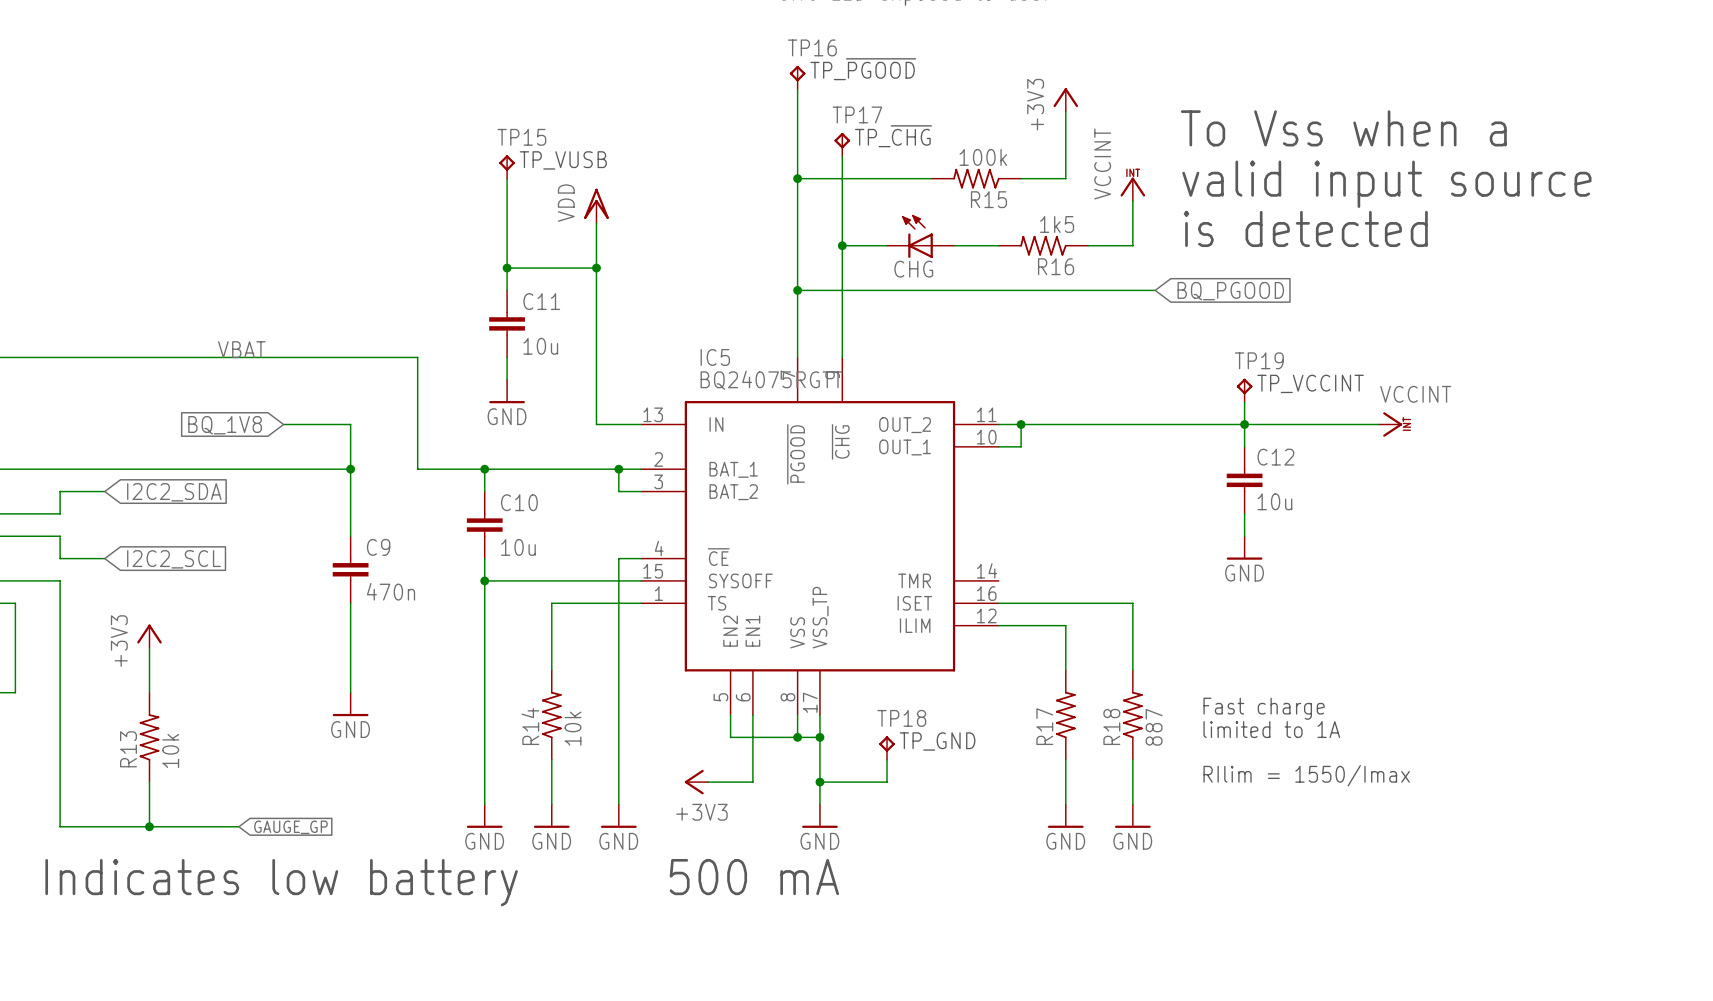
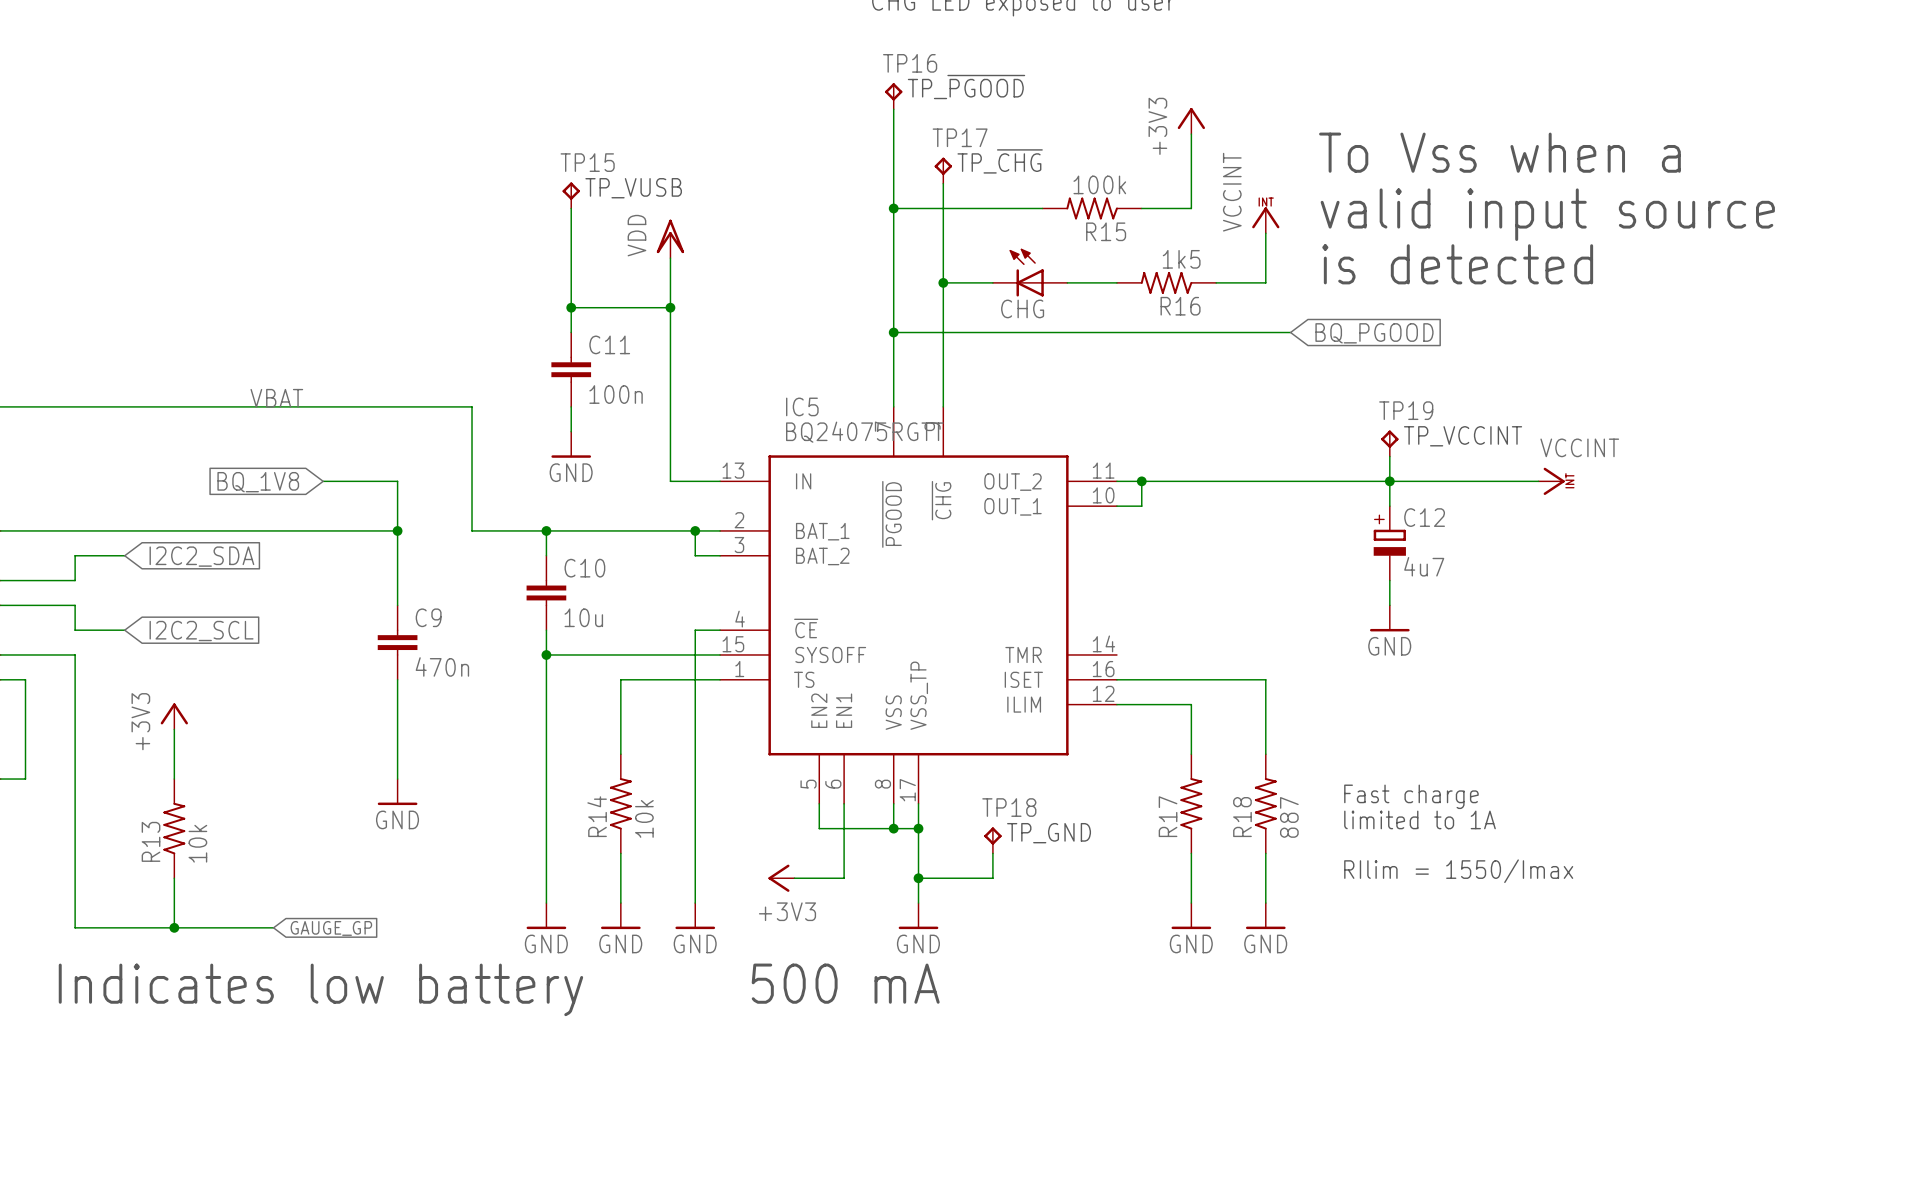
C11 value: 10u (540, 346) -> 100n (616, 394)
C12 symbol: [1226, 446, 1263, 514] -> [1373, 506, 1406, 581]
C12 value: 10u (1274, 501) -> 4u7 (1424, 566)

